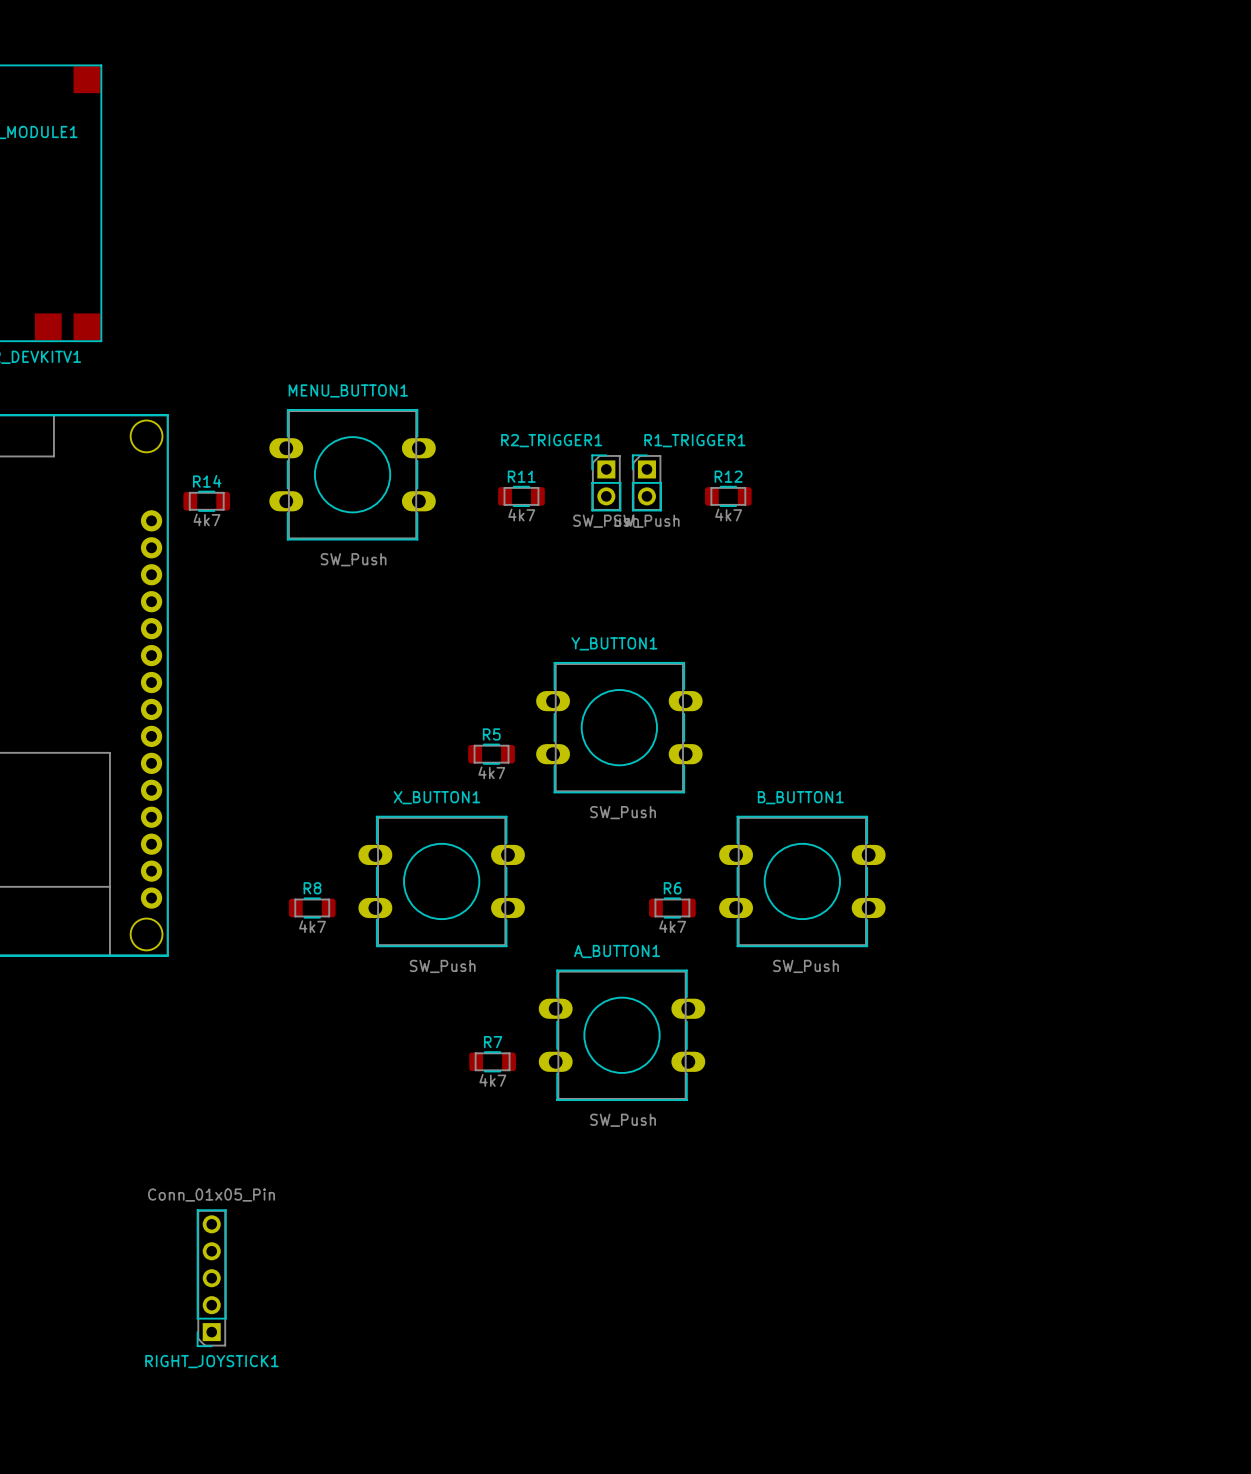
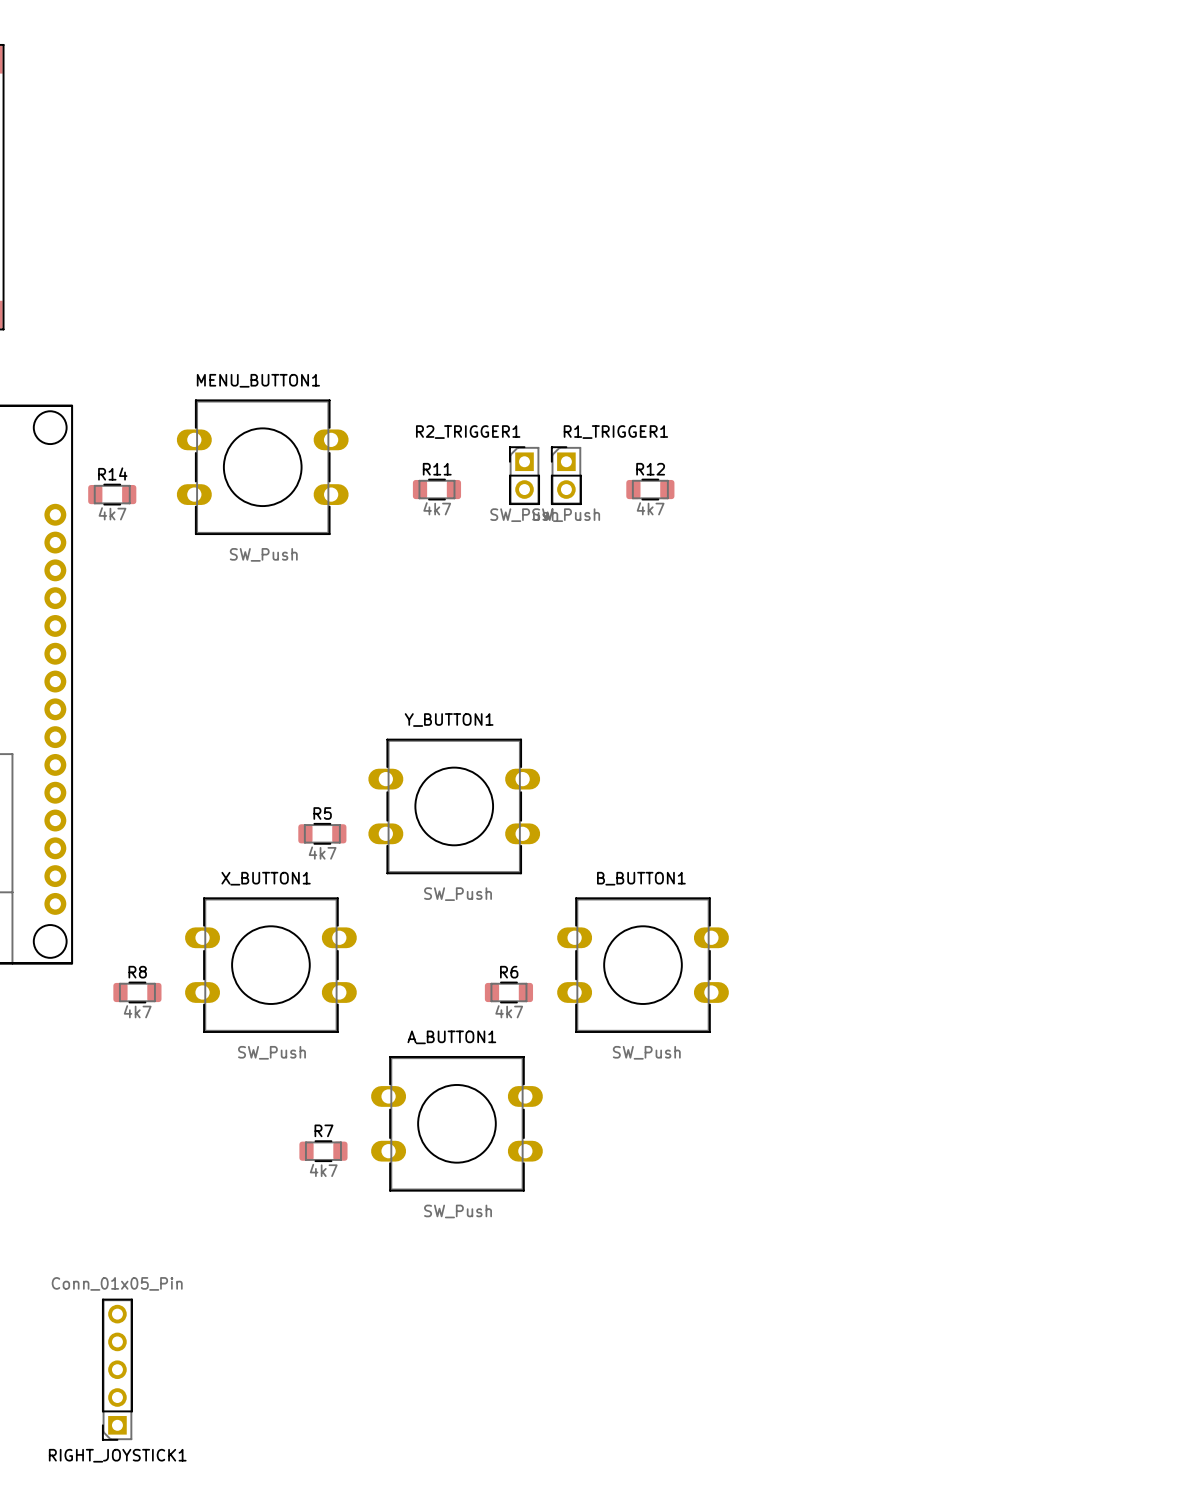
Y_BUTTON1 position: (619, 727) -> (454, 806)
R5 position: (491, 754) -> (322, 833)
X_BUTTON1 position: (441, 881) -> (270, 965)
B_BUTTON1 position: (802, 881) -> (643, 965)
R8 position: (312, 907) -> (137, 992)
R6 position: (672, 907) -> (508, 992)
A_BUTTON1 position: (622, 1035) -> (456, 1123)
R7 position: (492, 1061) -> (323, 1151)
RIGHT_JOYSTICK1 position: (211, 1278) -> (117, 1369)

